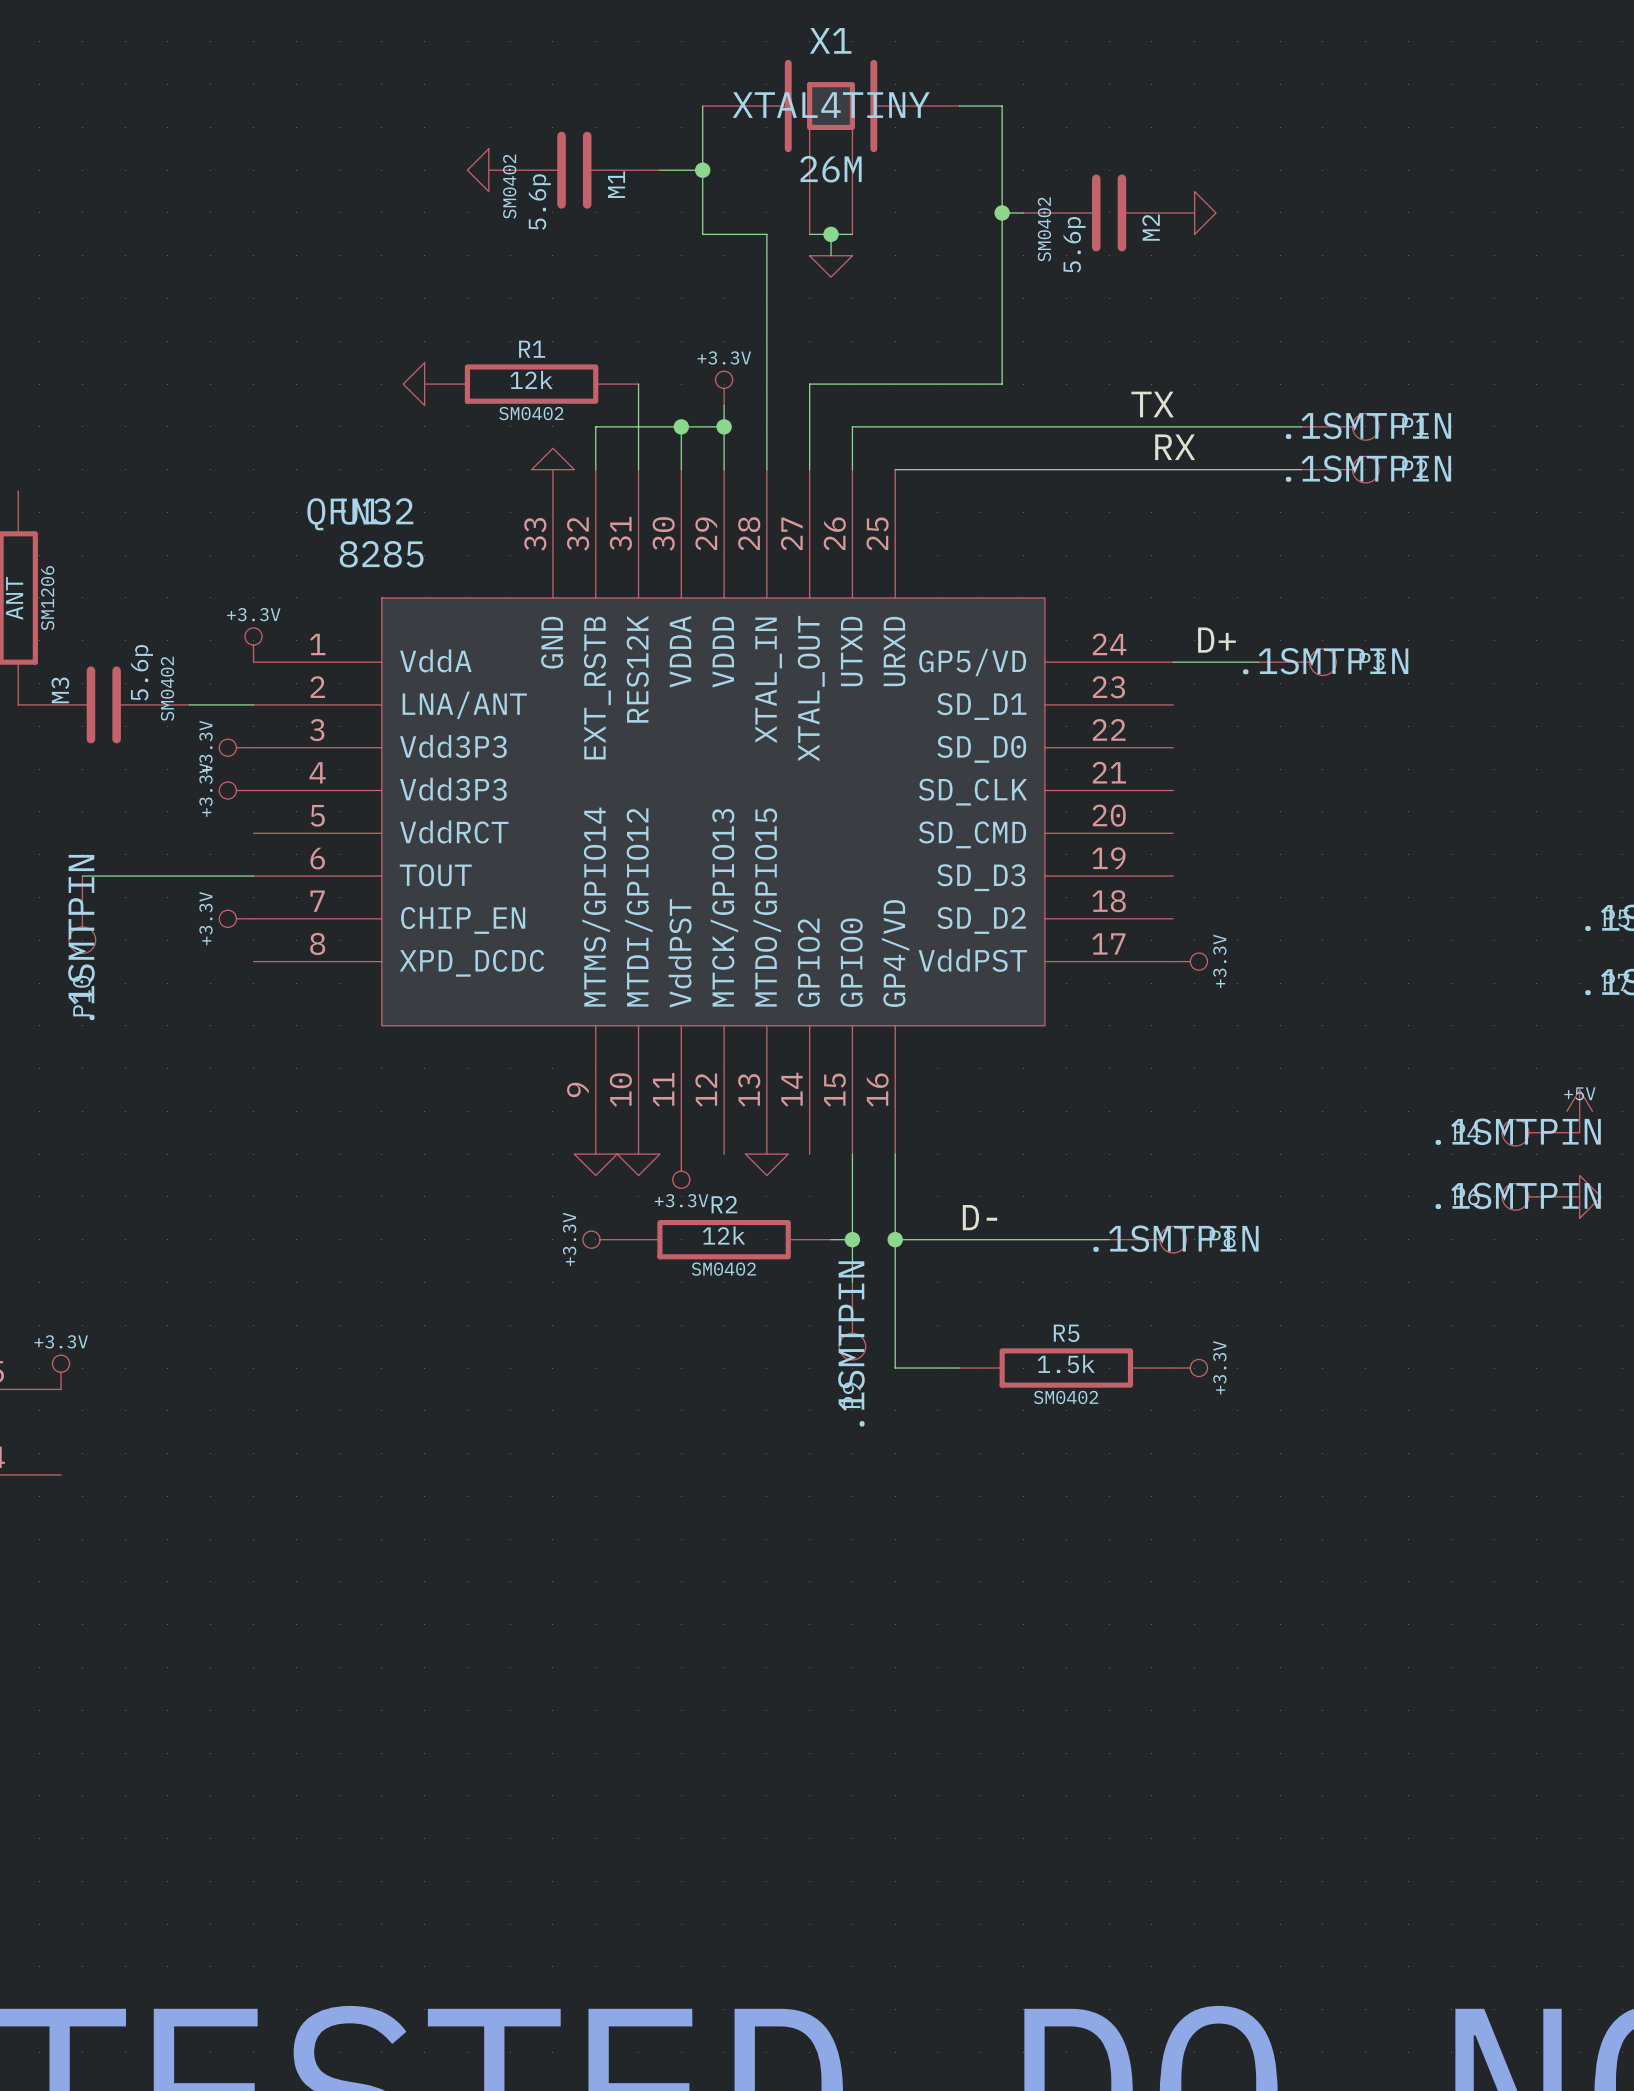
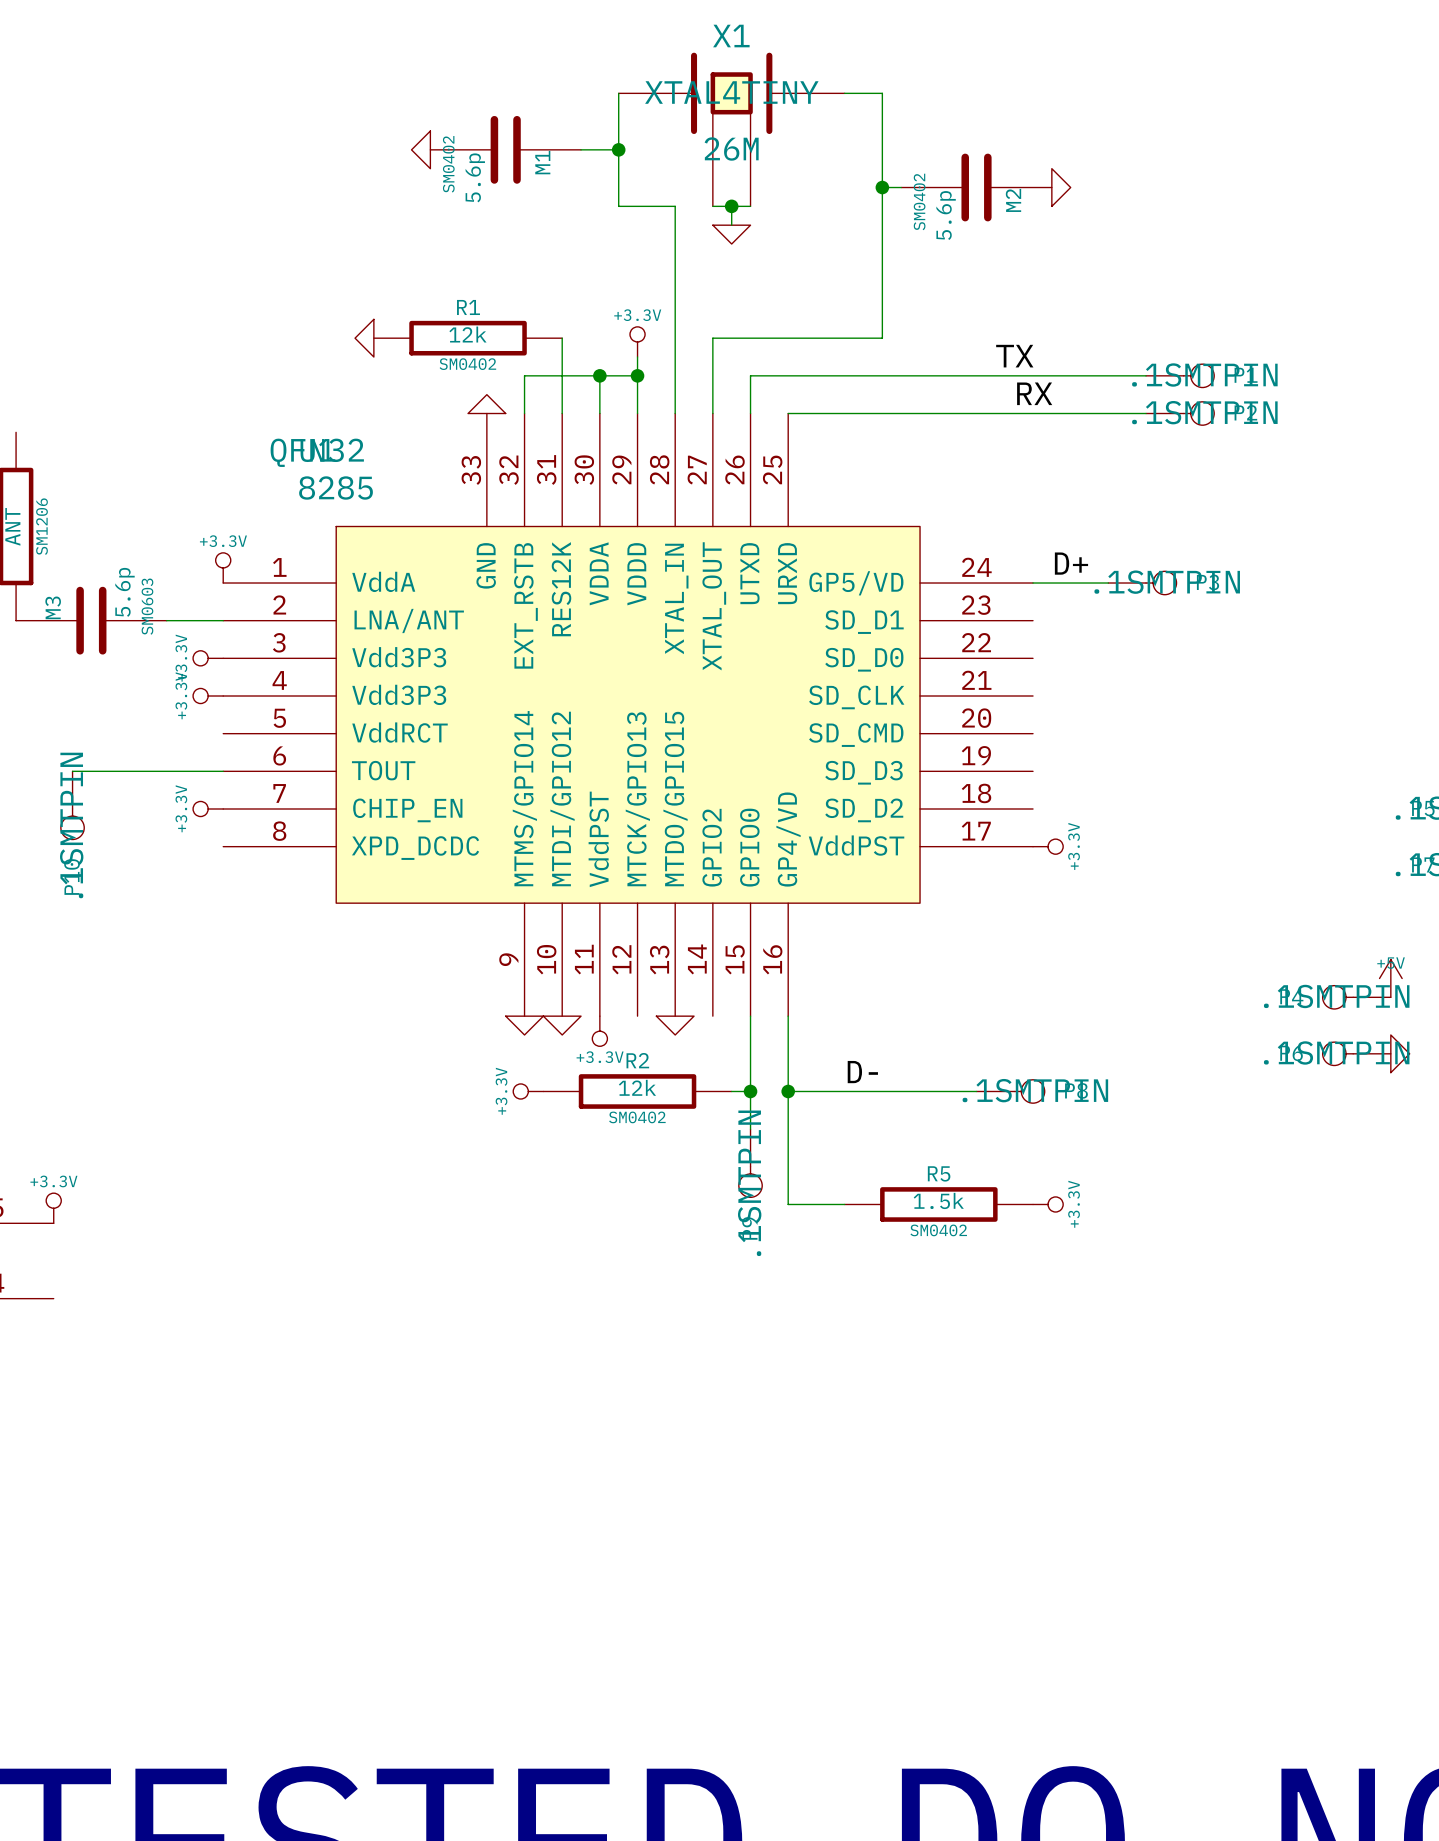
M3 text: SM0402 (167, 688) -> SM0603 (147, 606)

